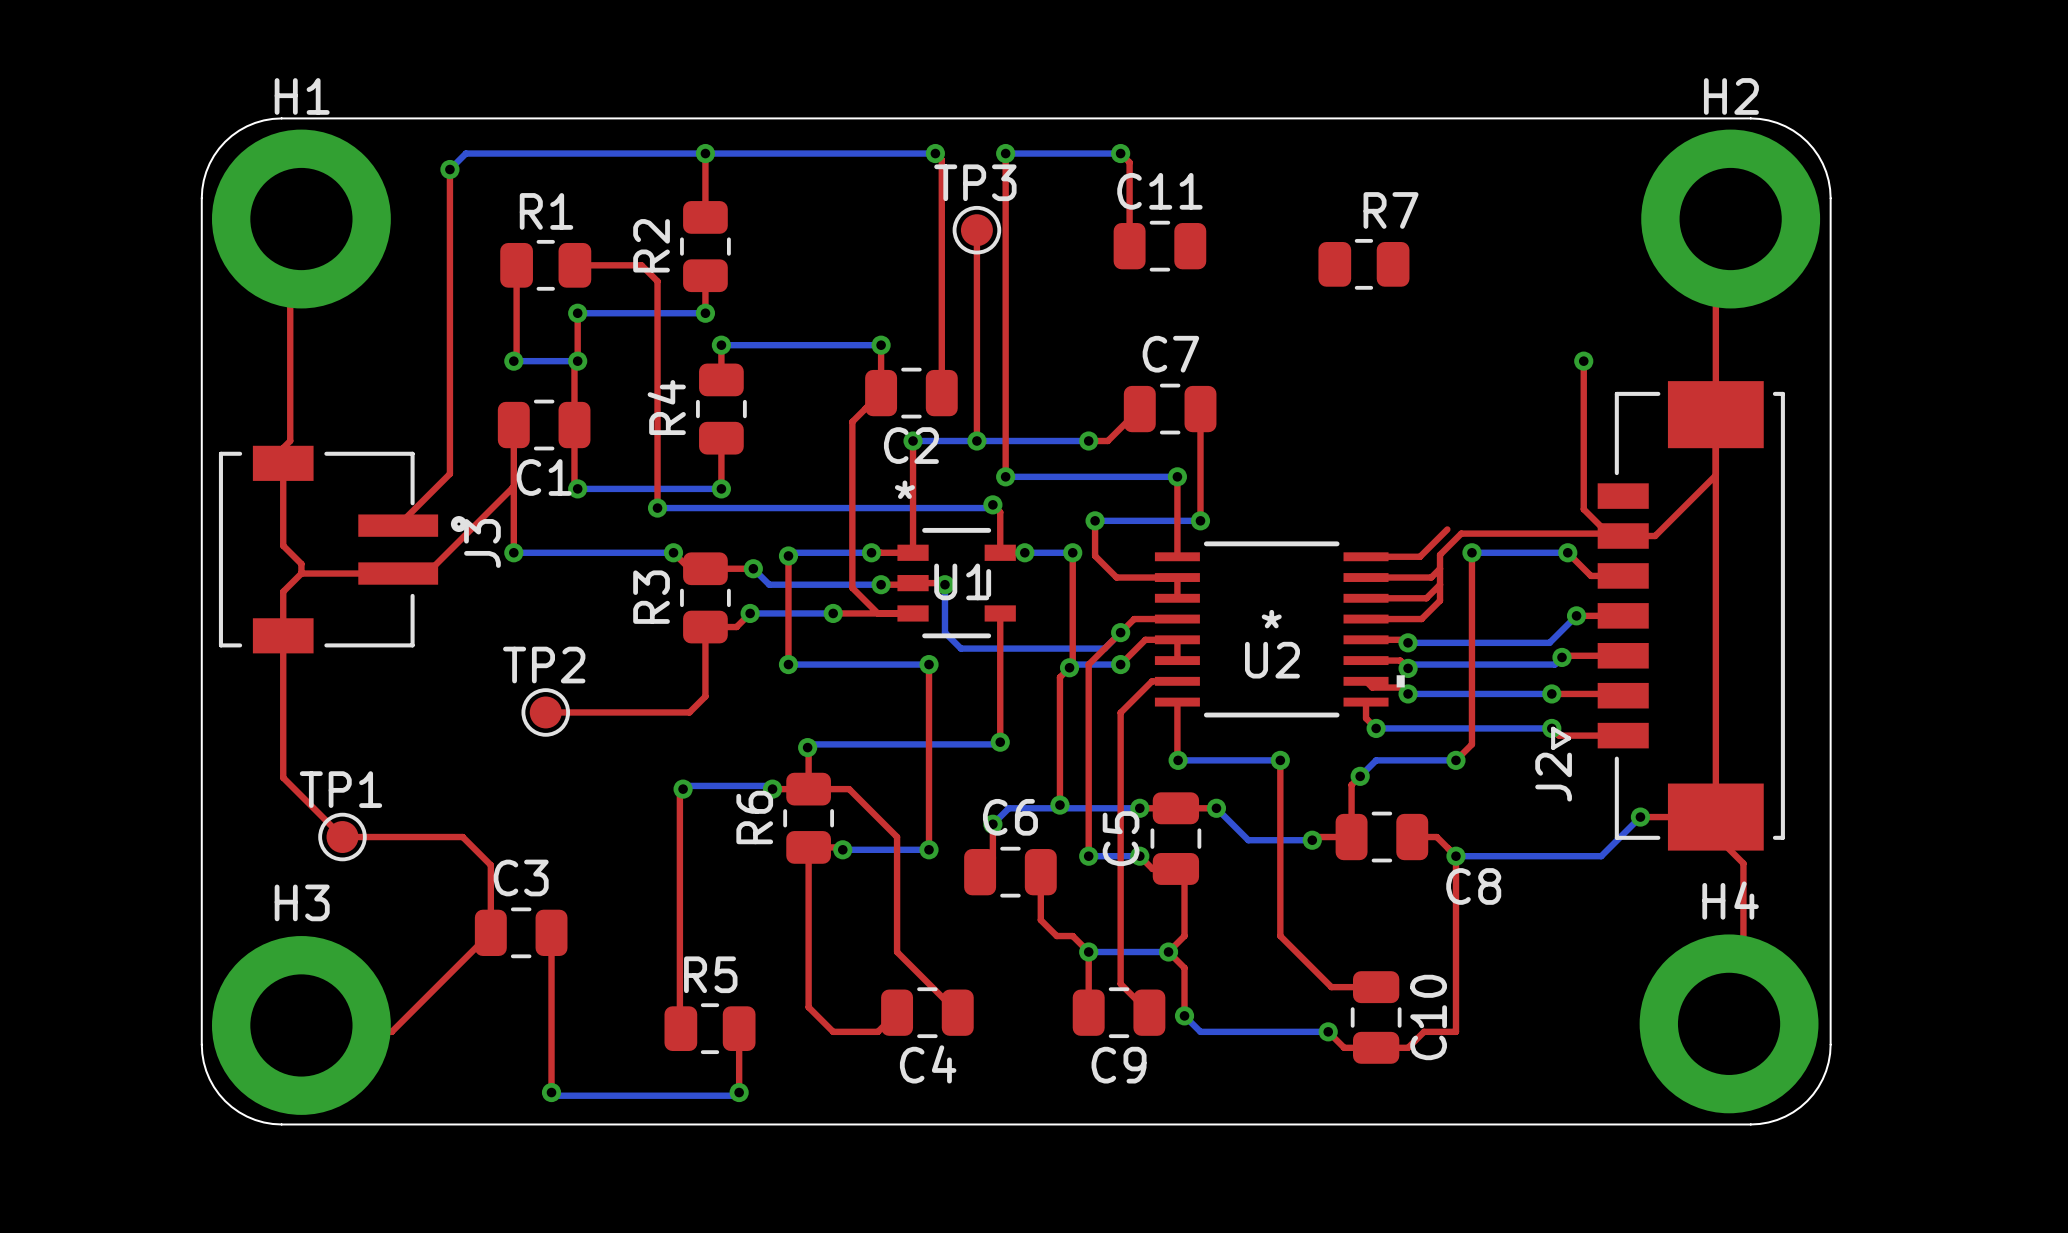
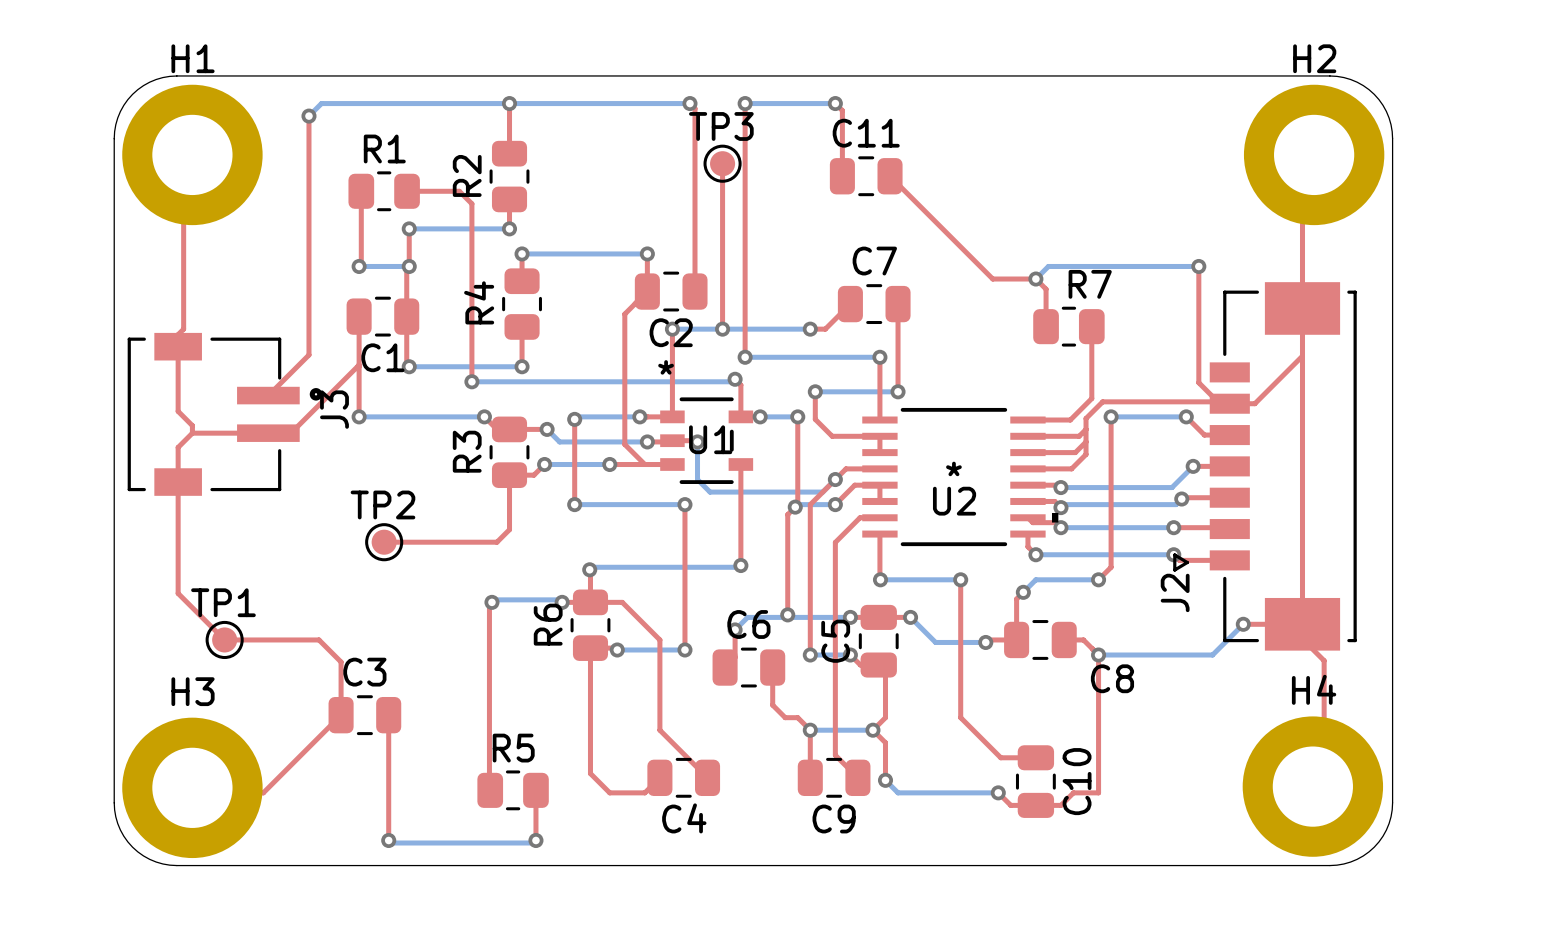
top track: none -> (890, 176) (992, 279) (1035, 279) (1046, 289) (1046, 326)
R7 position: (1363, 264) -> (1068, 326)
bottom track: none -> (1198, 266) (1048, 266) (1035, 279)
via: none -> (1035, 279)
top track: none -> (1091, 327) (1091, 398)

